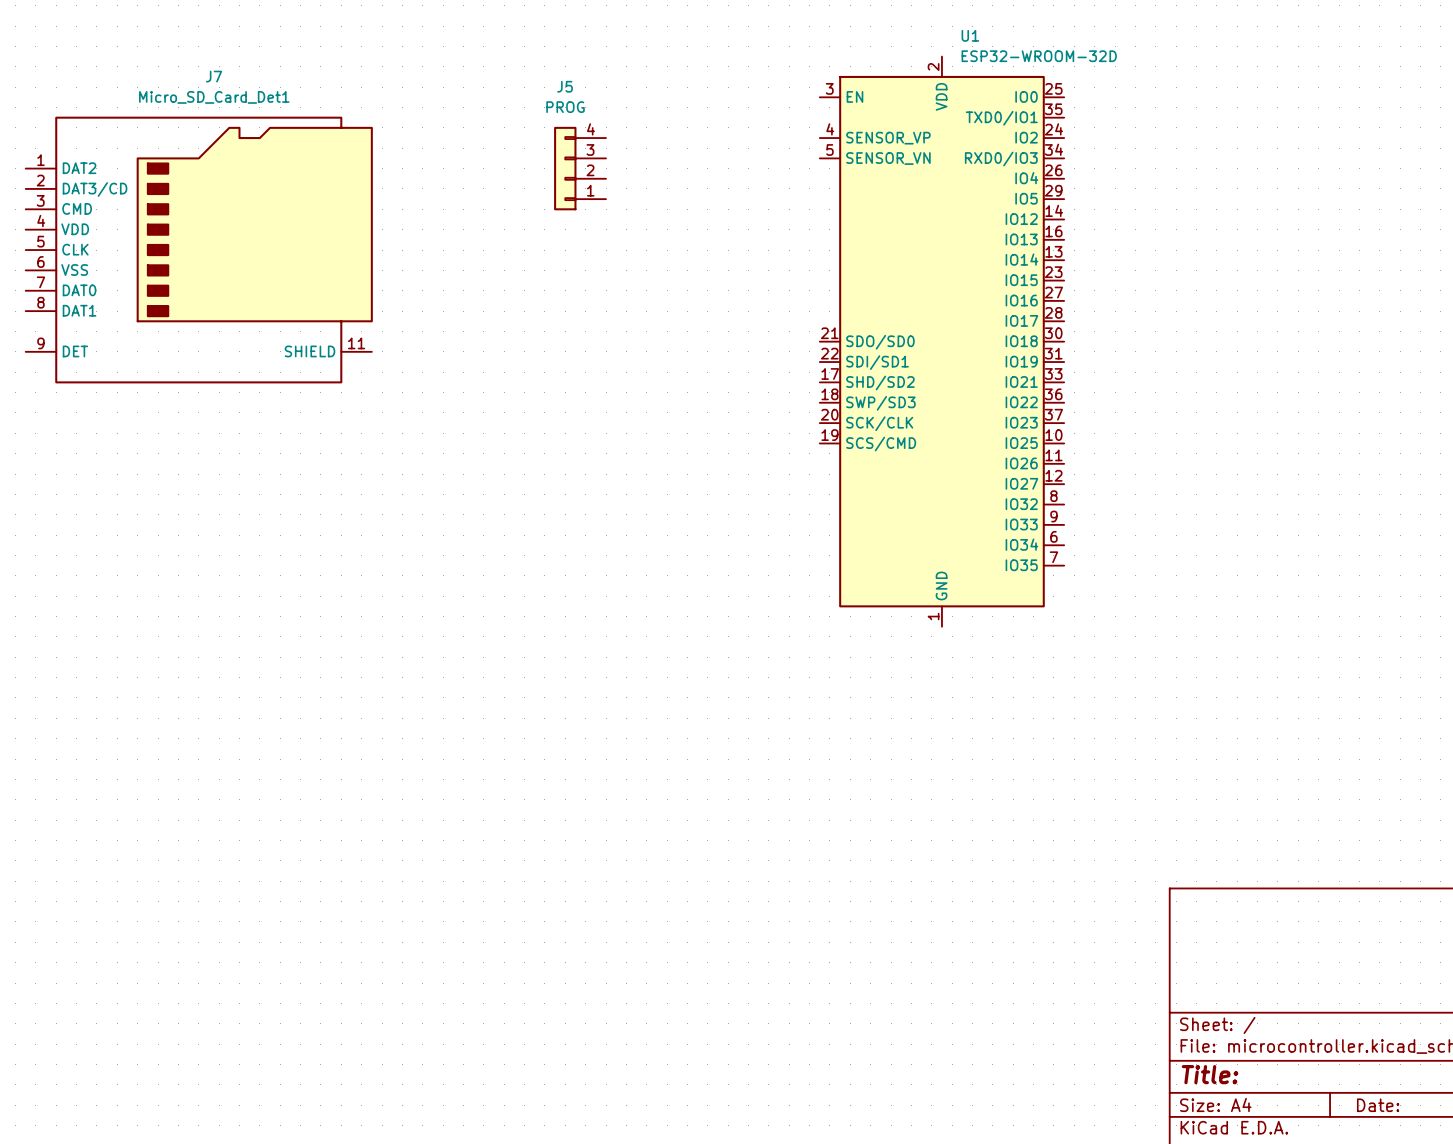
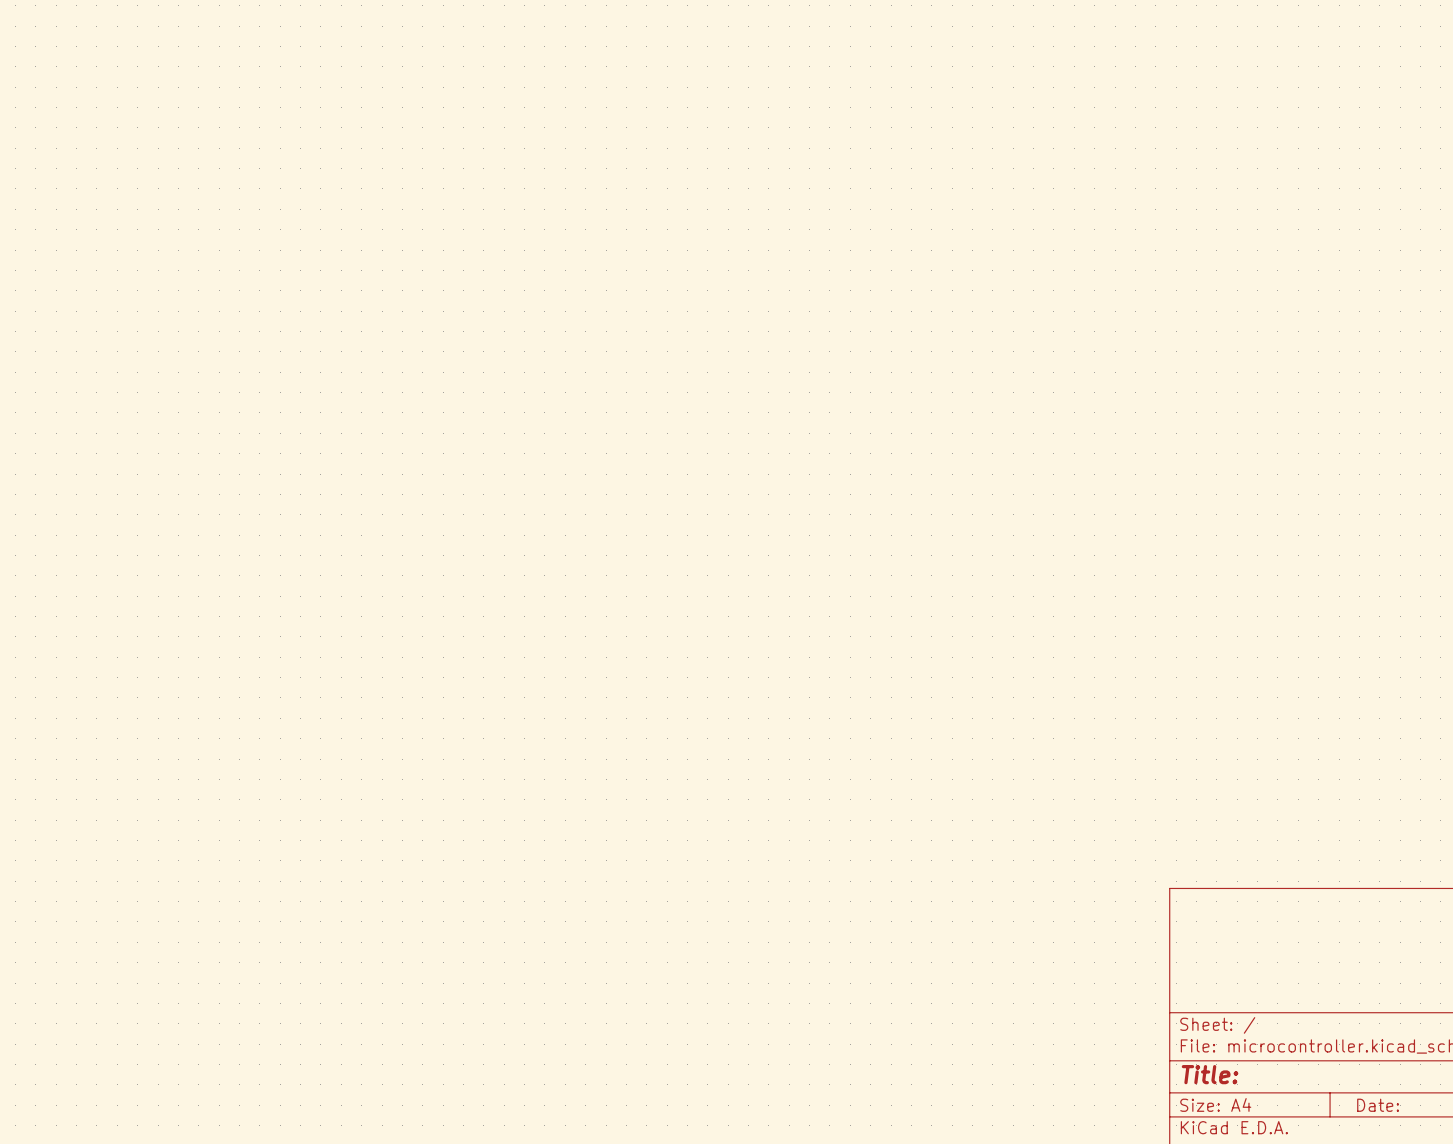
J5: PROG (580, 168) -> none
J7: Micro_SD_Card_Det1 (199, 250) -> none
U1: ESP32-WROOM-32D (941, 341) -> none

